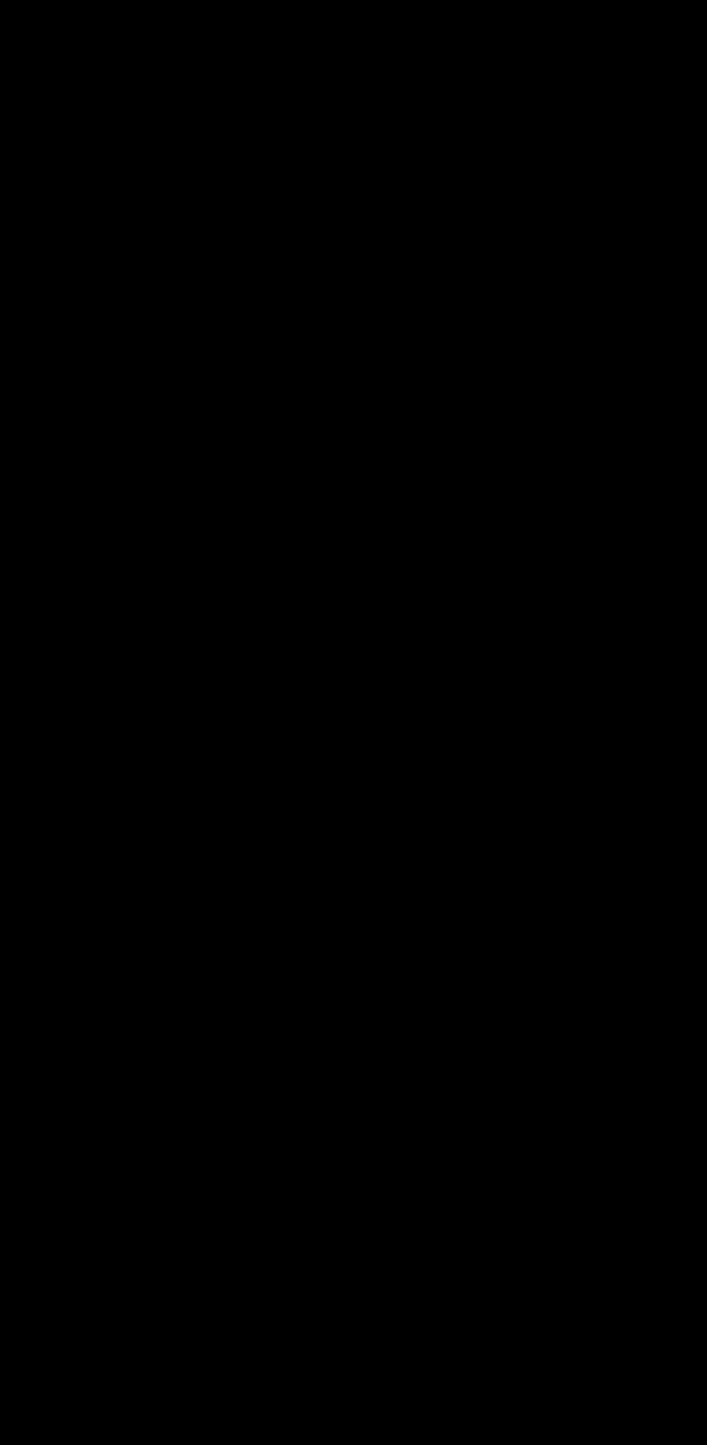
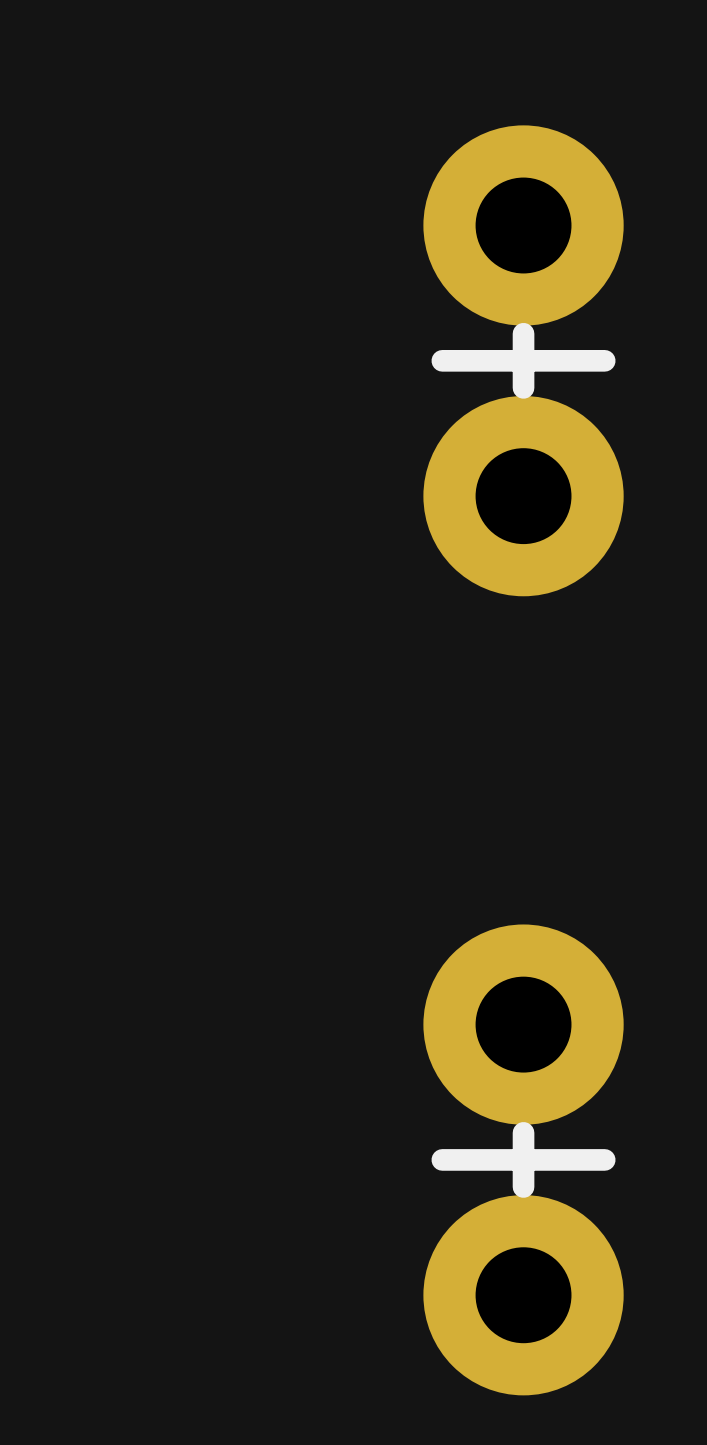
part: none -> (523, 360)
part: none -> (523, 1159)

